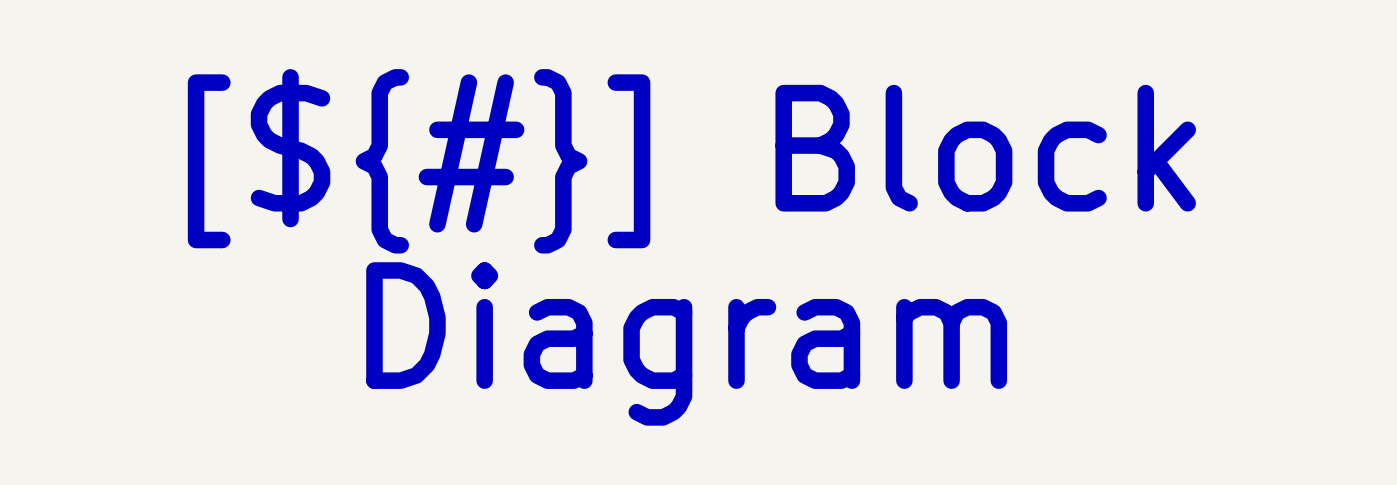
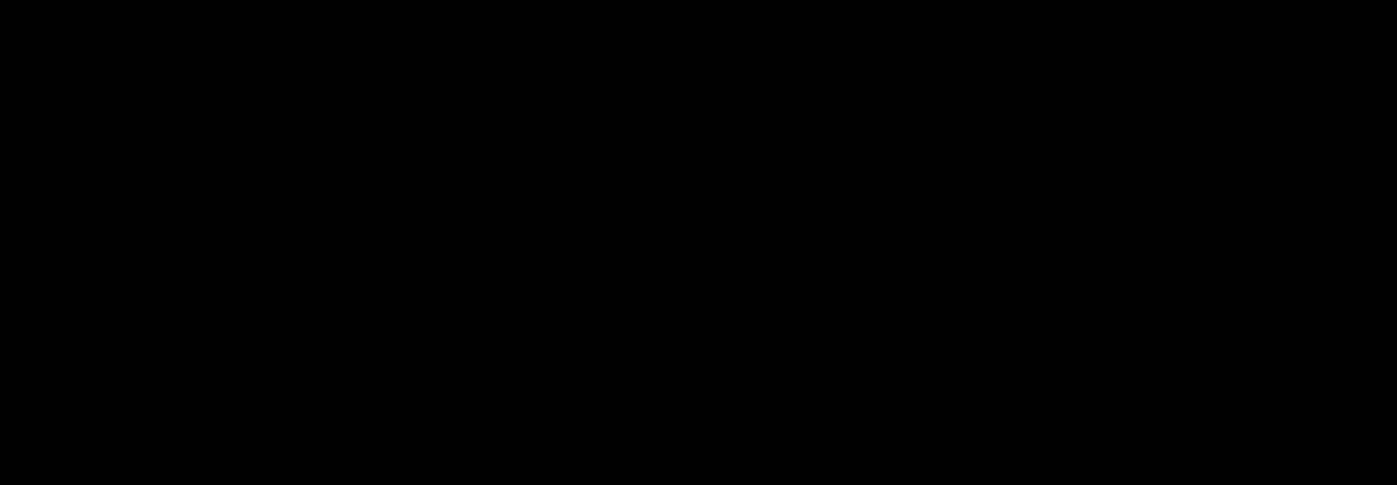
text: [${#}] Block (691, 161) -> none
text: Diagram (686, 343) -> none

